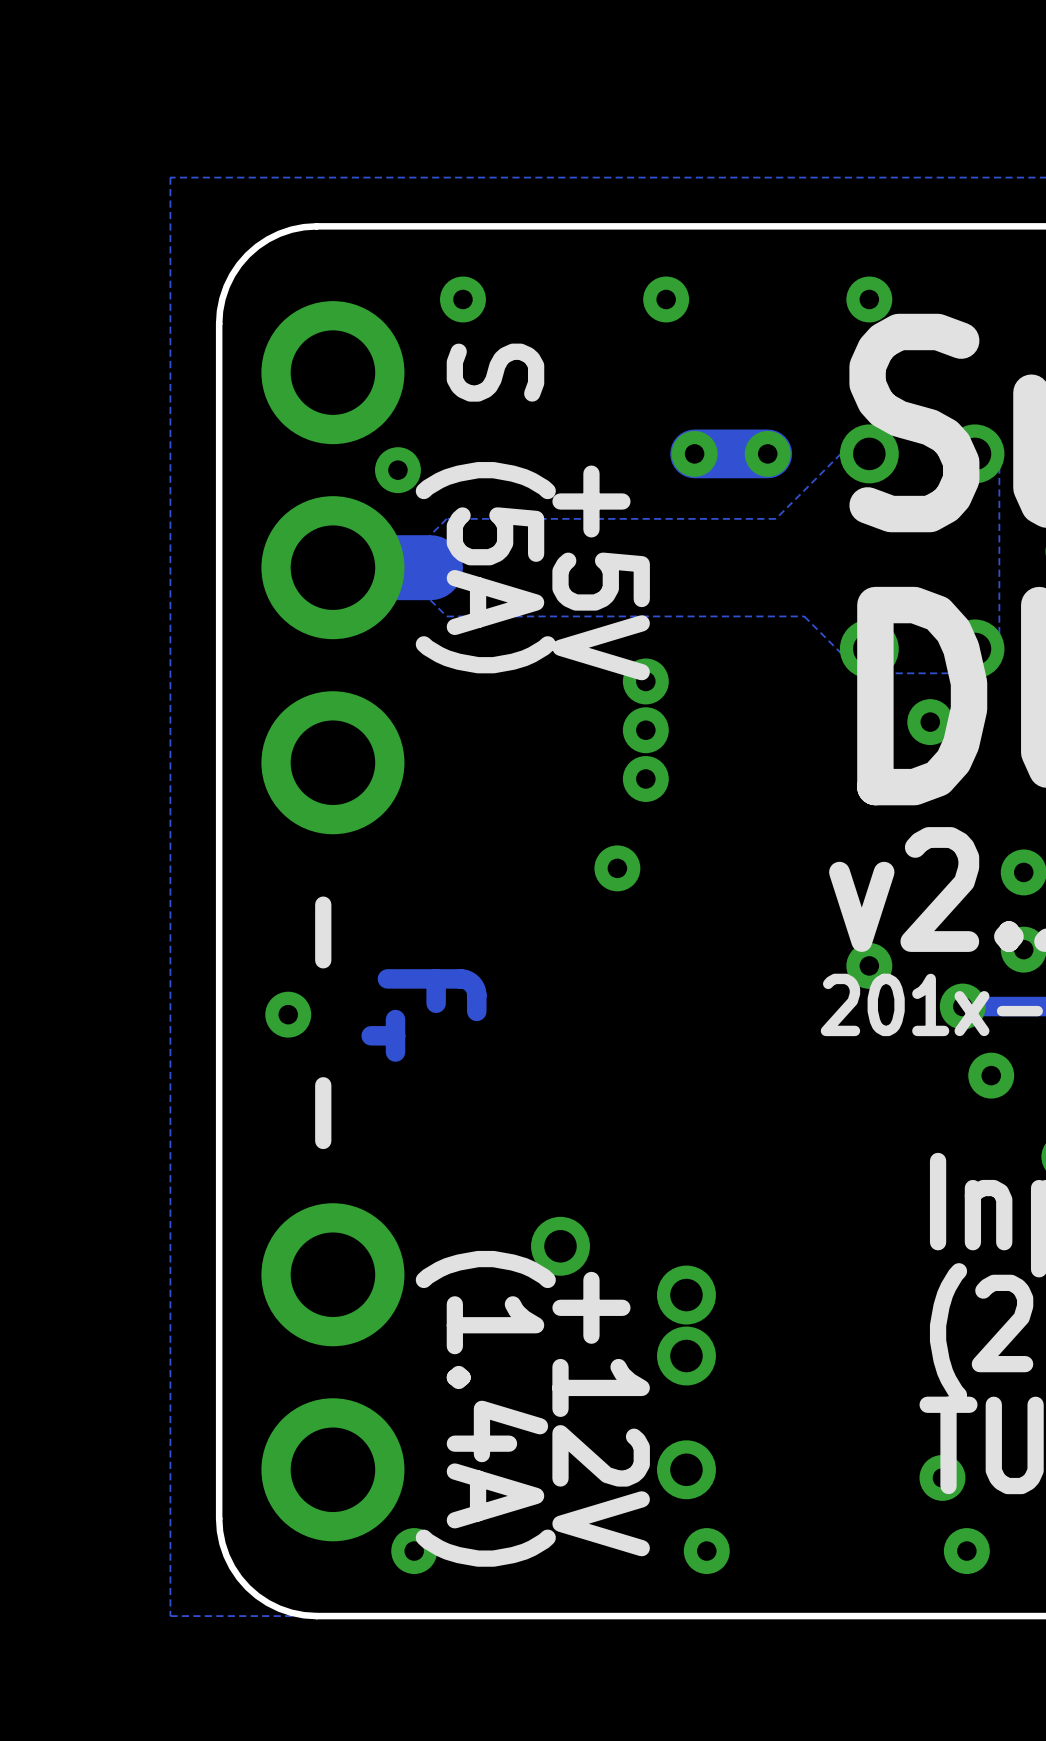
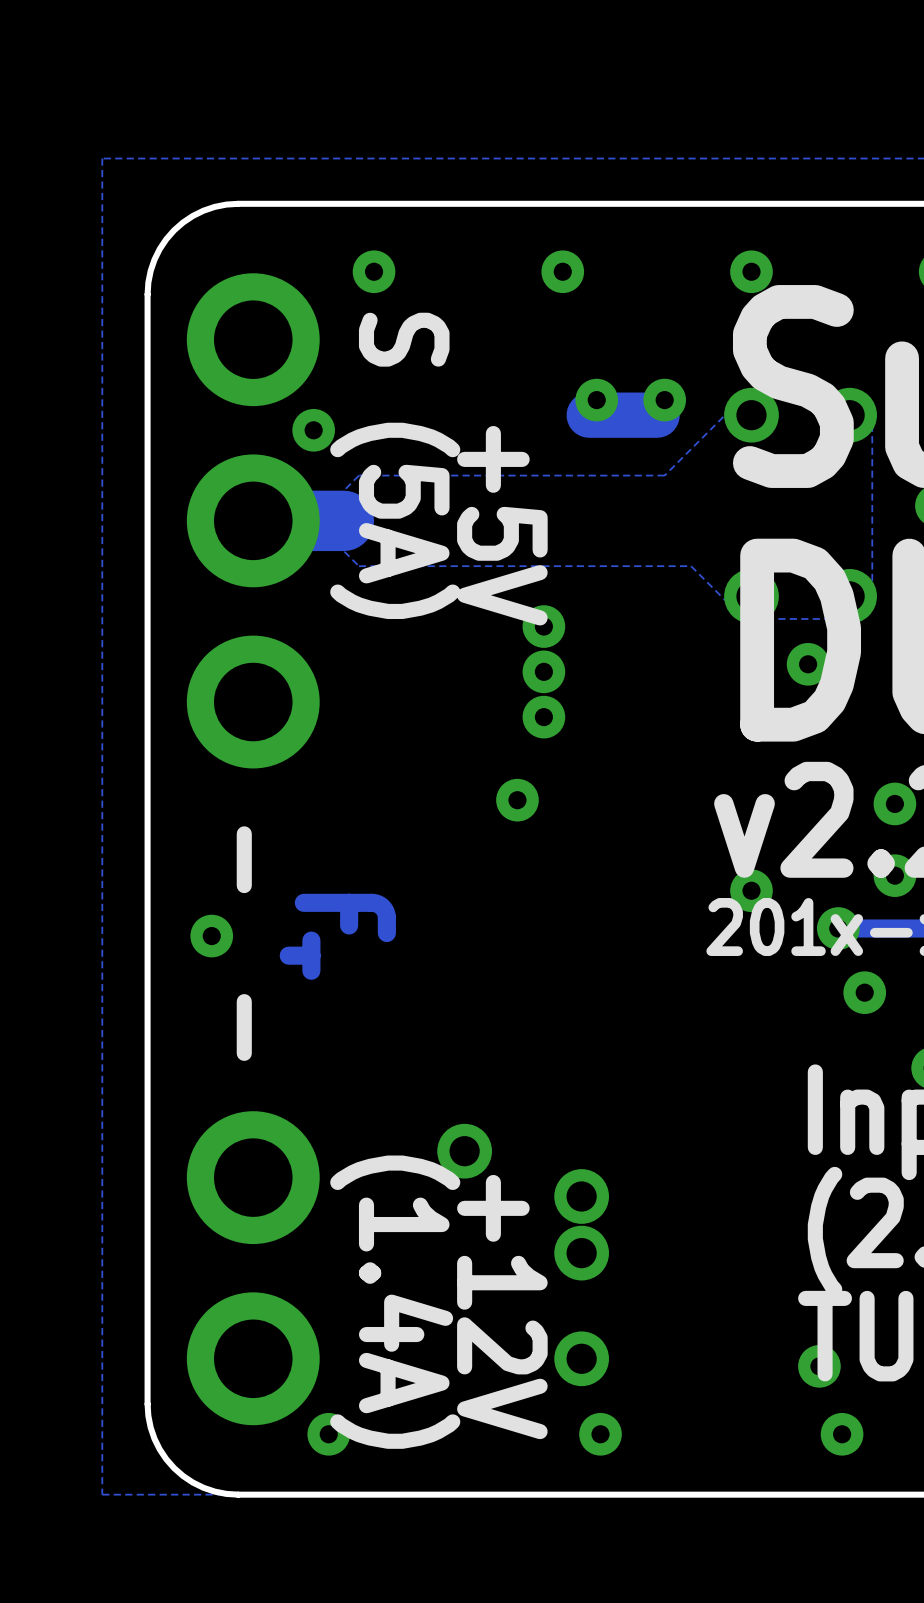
via position: (694, 453) -> (596, 400)
via position: (767, 453) -> (664, 400)

